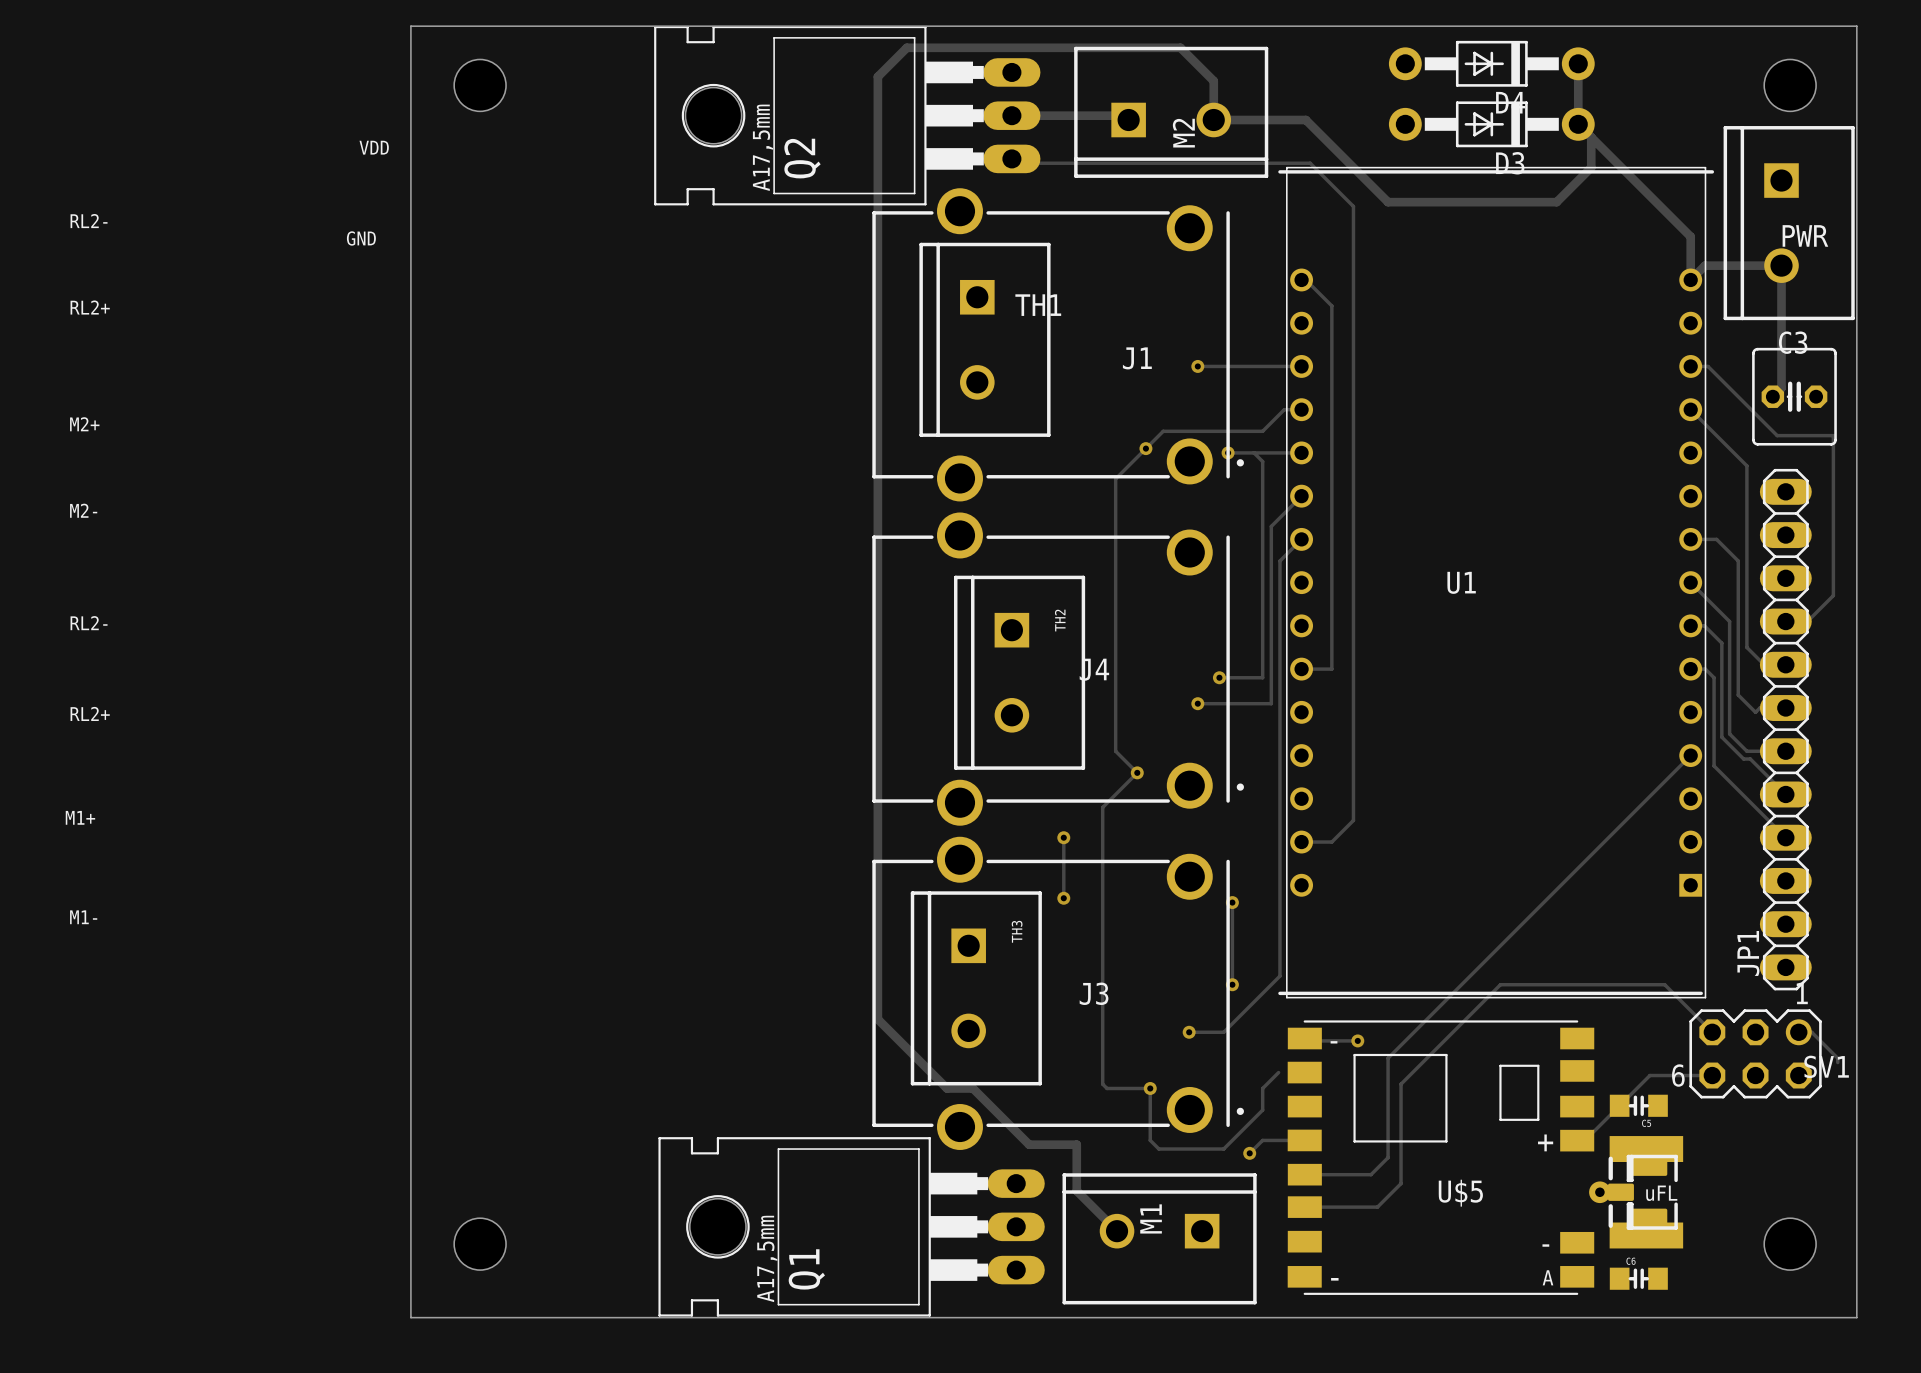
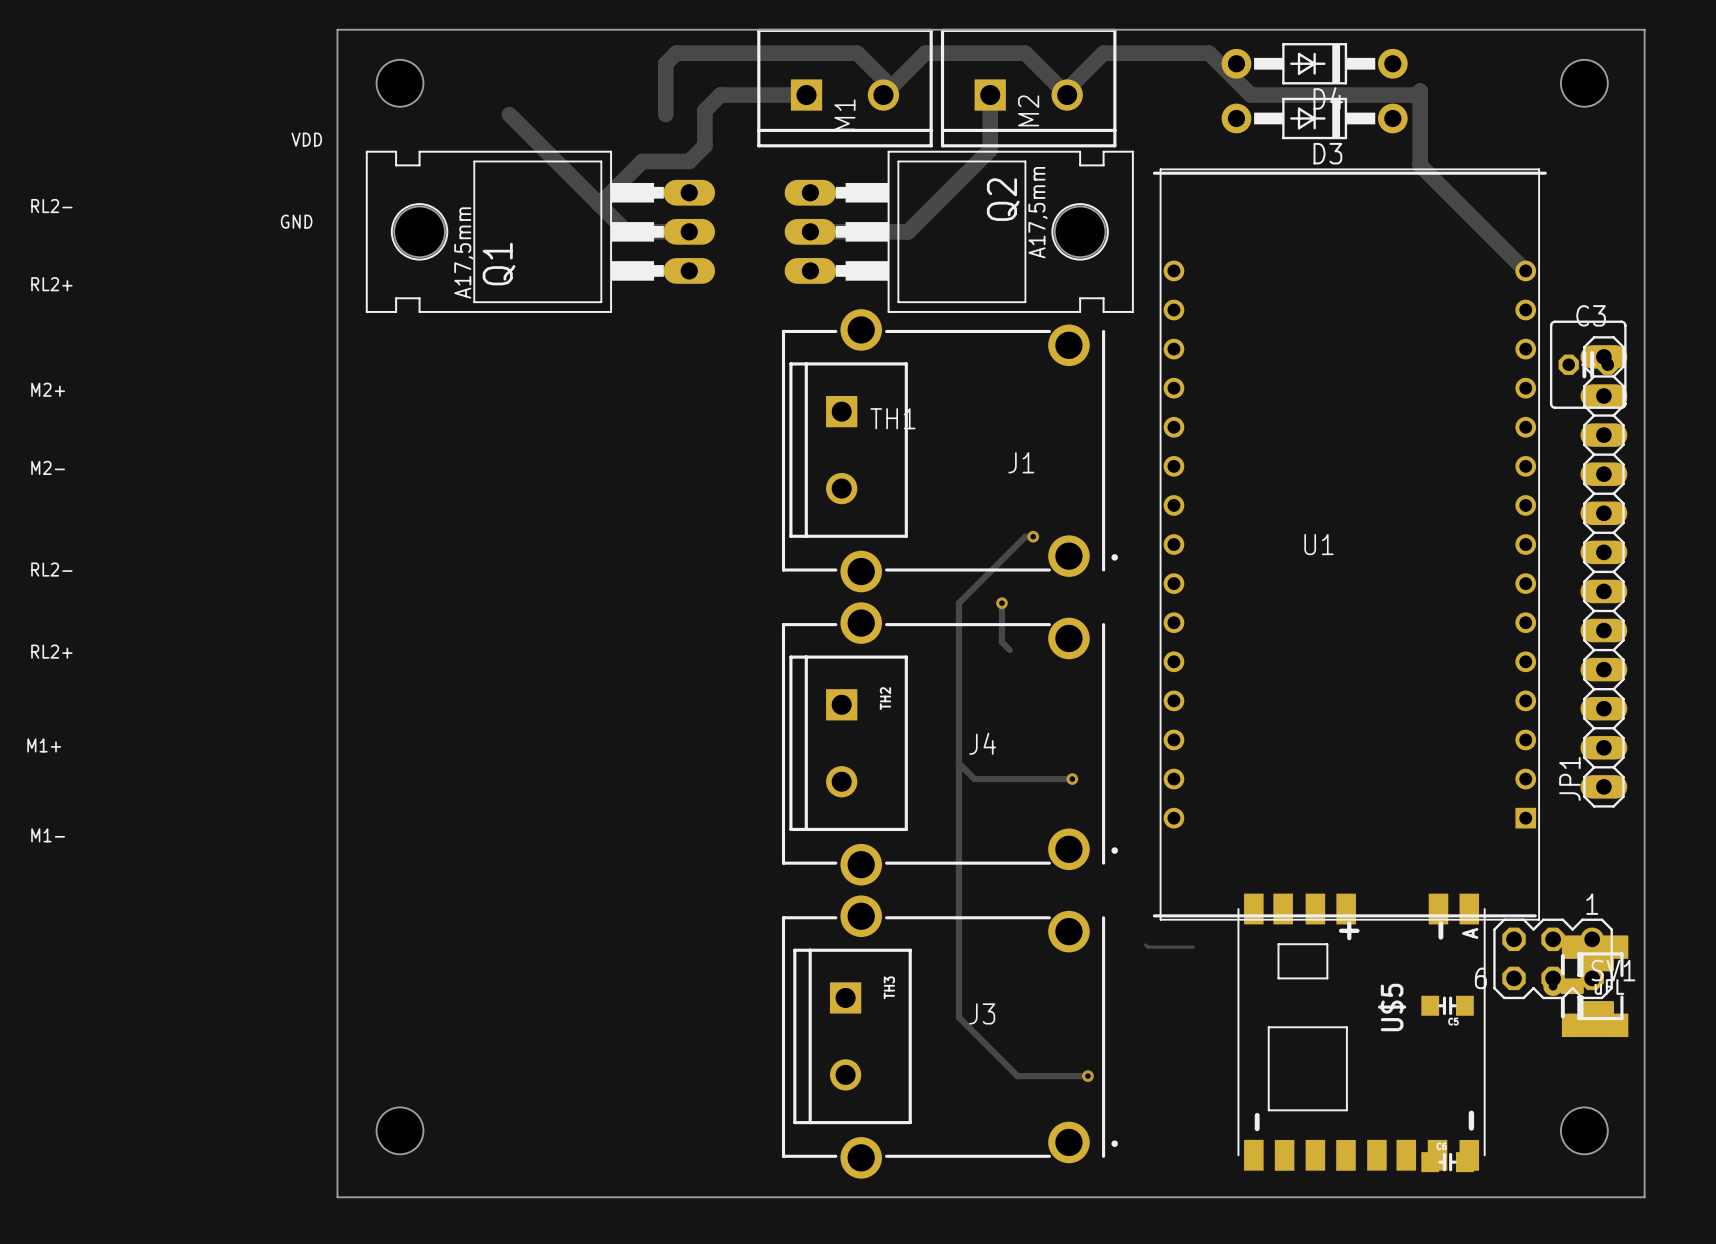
Q2 footprint: [654, 25, 1041, 206] -> [784, 150, 1134, 313]
track: (1578, 63) (1578, 124) (1690, 236) (1690, 279) (1705, 265) (1781, 265) (1781, 388) (1772, 396) -> none
track: none -> (806, 95) (720, 95) (704, 110) (704, 145) (689, 161) (642, 161) (599, 204)
track: none -> (990, 95) (990, 149) (908, 231) (810, 231)
M2 position: (1171, 112) -> (1028, 88)
track: (1011, 115) (1124, 115) (1128, 120) -> none
track: none -> (509, 114) (626, 231) (689, 231)
track: none -> (665, 114) (665, 63) (676, 53) (857, 53) (883, 79) (883, 95) (925, 53) (1025, 53) (1067, 95) (1067, 89) (1103, 53) (1209, 53) (1250, 95) (1416, 95) (1420, 91) (1420, 165) (1525, 270)
M2 name position: M2 (1183, 133) -> M2 (1028, 110)
track: (1591, 137) (1591, 167) (1556, 202) (1388, 202) (1305, 120) (1213, 120) (1213, 81) (1180, 47) (906, 47) (877, 76) (877, 1019) (947, 1088) (972, 1088) (1029, 1144) (1076, 1144) (1076, 1190) (1117, 1231) -> none
Q2 name position: Q2 (802, 158) -> Q2 (1003, 199)
track: (1011, 158) (1016, 163) (1310, 163) (1353, 206) (1353, 820) (1331, 842) (1301, 842) -> none
PWR: (1789, 223) -> none
track: (1301, 279) (1305, 279) (1331, 305) (1331, 669) (1301, 669) -> none
TH1 position: (984, 339) -> (848, 450)
J1 position: (1058, 344) -> (949, 450)
track: (1197, 366) (1301, 366) -> none
via: (1197, 366) -> none
track: (1690, 366) (1708, 366) (1777, 435) (1833, 435) (1833, 595) (1807, 621) (1785, 621) -> none
track: (1301, 409) (1284, 409) (1262, 431) (1163, 431) (1115, 478) (1115, 751) (1137, 772) (1102, 807) (1102, 1084) (1107, 1088) (1150, 1088) (1150, 1140) (1158, 1149) (1223, 1149) (1262, 1110) (1262, 1088) (1278, 1072) -> none
track: (1690, 409) (1746, 465) (1746, 647) (1764, 664) (1785, 664) -> none
via: (1145, 448) -> none
track: (1228, 452) (1301, 452) -> none
via: (1228, 452) -> none
track: (1254, 452) (1262, 461) (1262, 677) (1219, 677) -> none
track: (1301, 496) (1271, 526) (1271, 703) (1197, 703) -> none
track: (1301, 539) (1279, 561) (1279, 976) (1223, 1032) (1189, 1032) -> none
track: (1690, 539) (1716, 539) (1738, 561) (1738, 695) (1755, 712) (1759, 708) (1785, 708) -> none
U1 position: (1496, 582) -> (1349, 544)
track: (1690, 582) (1729, 621) (1729, 733) (1746, 751) (1785, 751) -> none
track: none -> (1033, 536) (1025, 536) (958, 603) (958, 1017) (1017, 1076) (1087, 1076)
via: none -> (1033, 536)
track: (1690, 625) (1704, 625) (1721, 643) (1721, 737) (1743, 759) (1750, 759) (1785, 794) -> none
track: none -> (1001, 603) (1001, 642) (1009, 650)
via: none -> (1001, 603)
J4 position: (1058, 669) -> (949, 743)
track: (1690, 669) (1705, 669) (1714, 677) (1714, 765) (1785, 837) -> none
TH2 position: (1019, 672) -> (848, 743)
via: (1219, 677) -> none
via: (1197, 703) -> none
JP1 position: (1785, 729) -> (1603, 571)
track: (1690, 755) (1388, 1058) (1388, 1157) (1371, 1174) (1304, 1174) -> none
via: (1137, 772) -> none
track: (1063, 837) (1063, 898) -> none
via: (1063, 837) -> none
track: none -> (958, 763) (974, 779) (1072, 779)
via: (1063, 898) -> none
track: (1232, 902) (1232, 984) -> none
via position: (1232, 902) -> (1072, 779)
JP1 name position: JP1 (1748, 953) -> JP1 (1569, 778)
via: (1232, 984) -> none
TH3 position: (976, 988) -> (852, 1036)
J3 position: (1058, 993) -> (949, 1037)
J3 name position: J3 (1094, 993) -> J3 (982, 1013)
via: (1189, 1032) -> none
track: (1712, 1032) (1664, 984) (1500, 984) (1401, 1084) (1401, 1183) (1377, 1207) (1304, 1207) -> none
track: (1798, 1032) (1811, 1032) (1837, 1058) (1837, 1062) -> none
via: (1357, 1040) -> none
track: (1712, 1075) (1649, 1075) (1584, 1140) (1577, 1140) -> none
via: (1150, 1088) -> none
track: (1304, 1140) (1262, 1140) (1249, 1153) -> none
via position: (1249, 1153) -> (1087, 1076)
U$5 rotation: 0° (1440, 1157) -> 90° counterclockwise (1361, 1032)
part position: (1636, 1192) -> (1585, 986)
Q1 position: (851, 1226) -> (540, 231)
M1 rotation: 0° (1159, 1238) -> 180° (844, 88)
M1 position: (1159, 1238) -> (844, 88)

